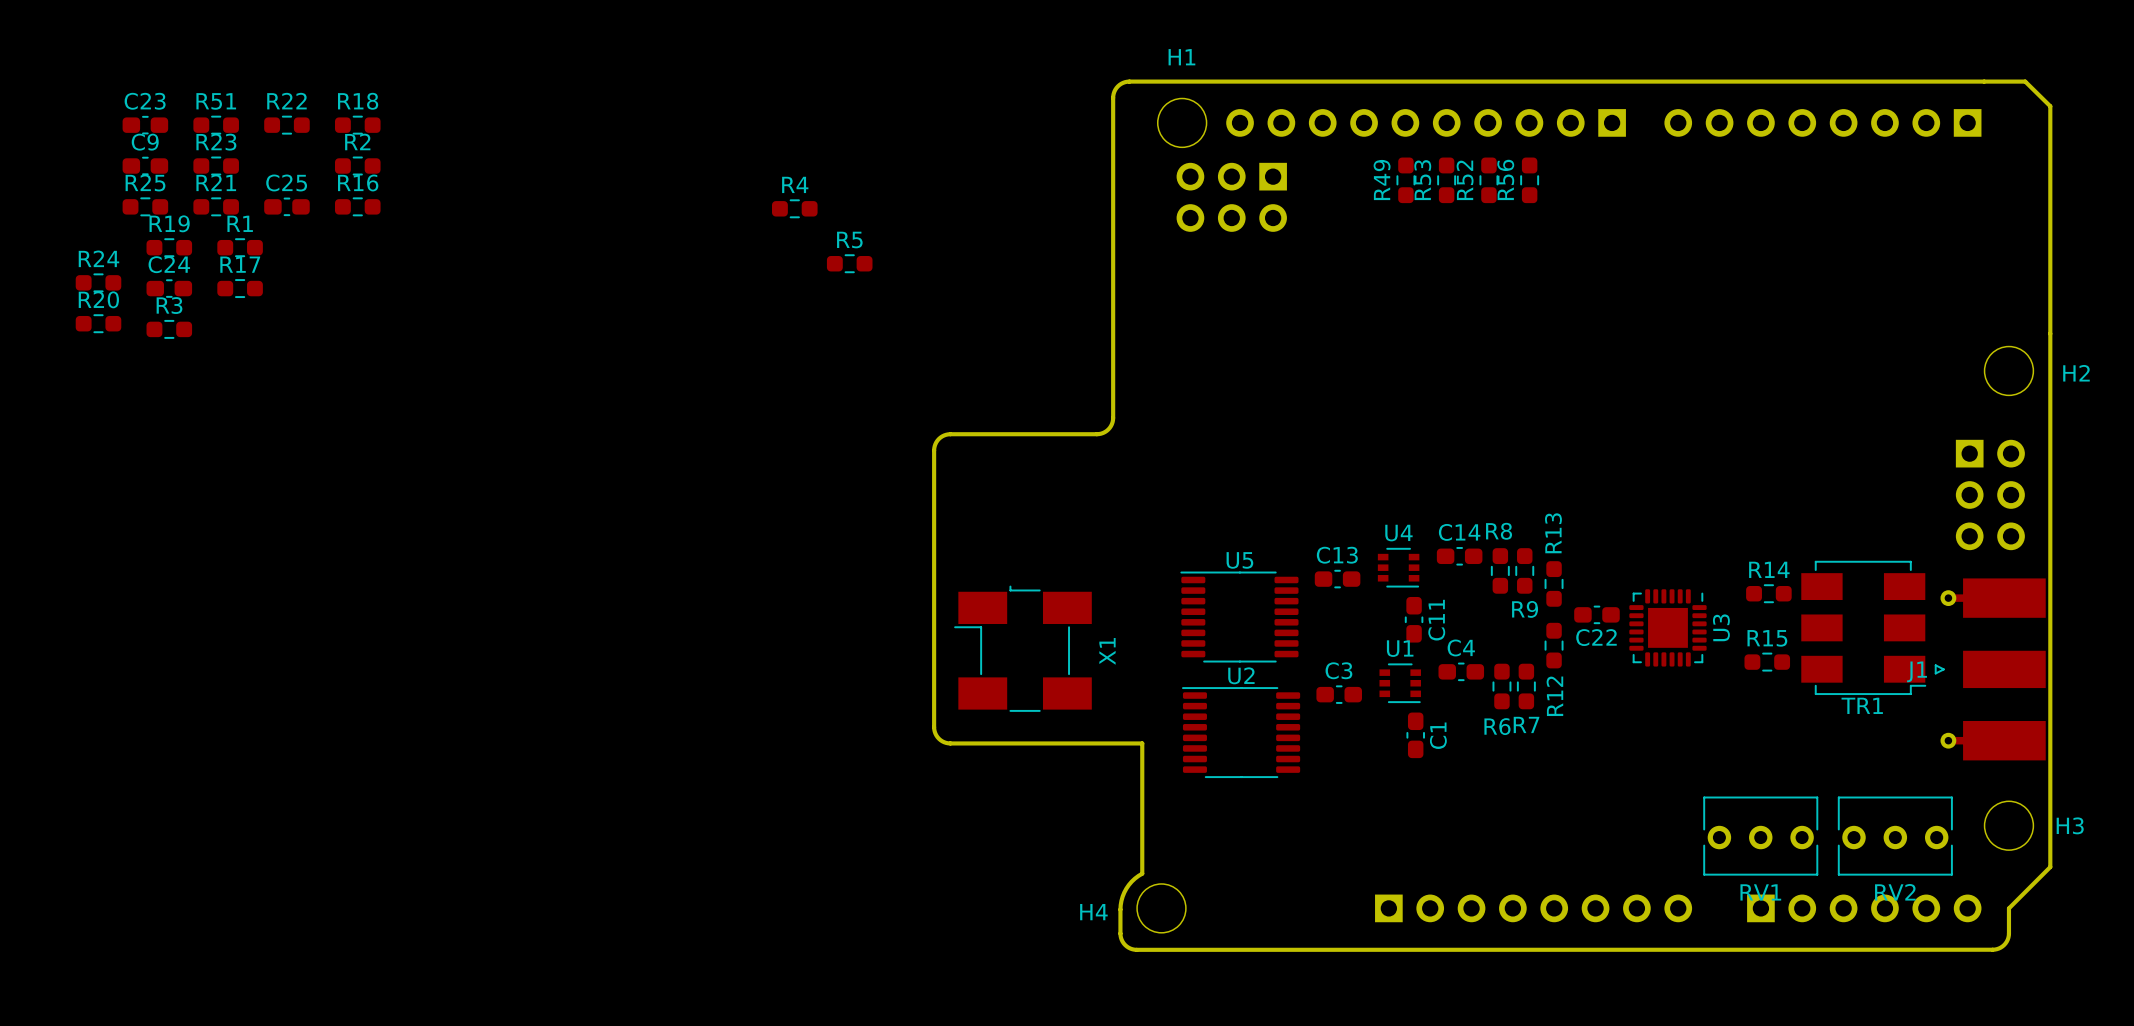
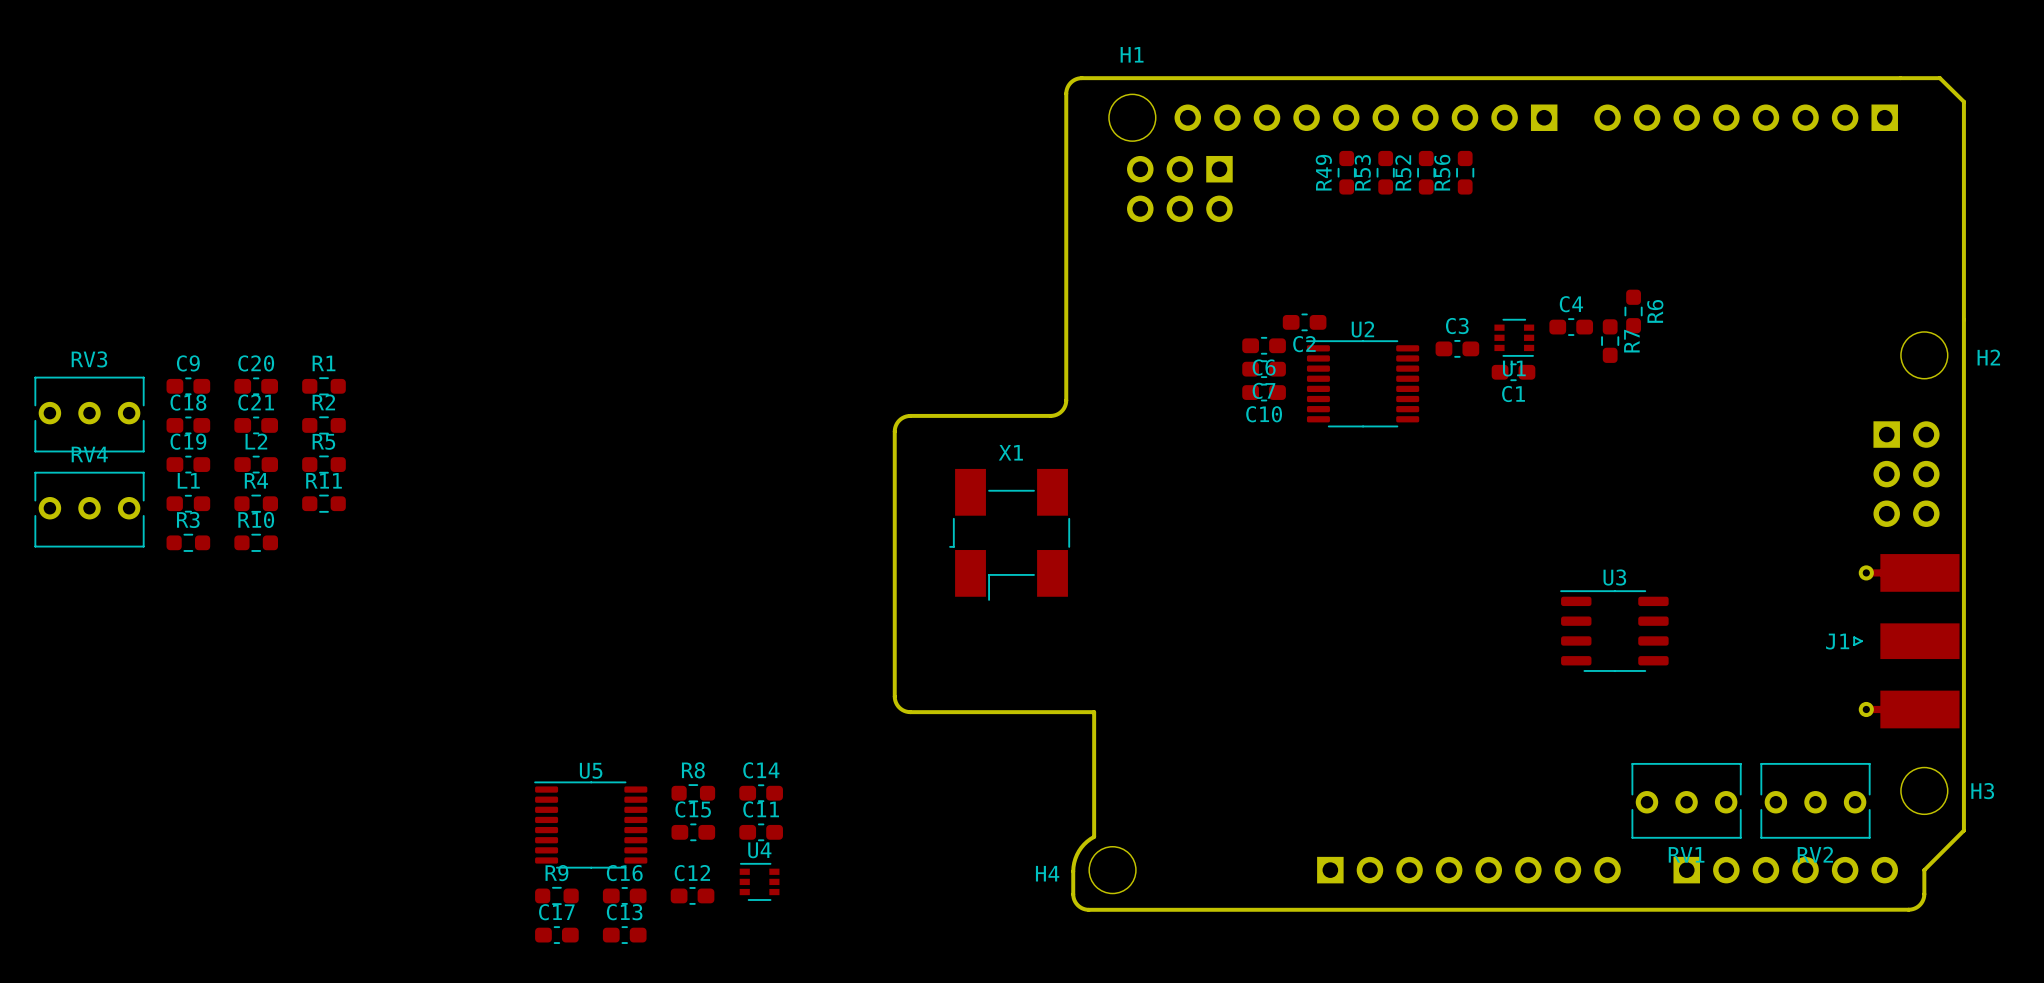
C23: (145, 125) -> none
R51: (216, 125) -> none
R22: (286, 125) -> none
R18: (357, 125) -> none
C9 position: (145, 166) -> (188, 386)
R23: (216, 166) -> none
R2 position: (357, 166) -> (323, 425)
R25: (145, 206) -> none
R21: (216, 206) -> none
C25: (286, 206) -> none
R16: (357, 206) -> none
R4 position: (794, 208) -> (256, 503)
R19: (169, 247) -> none
R1 position: (240, 247) -> (323, 386)
R5 position: (849, 263) -> (323, 464)
R24: (98, 282) -> none
C24: (169, 288) -> none
R17: (240, 288) -> none
R20: (98, 323) -> none
R3 position: (169, 329) -> (188, 542)
C2: none -> (1304, 322)
C6: none -> (1264, 345)
C7: none -> (1264, 369)
C20: none -> (256, 386)
C10: none -> (1264, 392)
RV3: none -> (89, 414)
C18: none -> (188, 425)
C21: none -> (256, 425)
C19: none -> (188, 464)
L2: none -> (256, 464)
L1: none -> (188, 503)
R11: none -> (323, 503)
RV4: none -> (89, 509)
C14 position: (1459, 556) -> (761, 793)
R10: none -> (256, 542)
U4 rotation: 0° (1398, 567) -> 180° (759, 881)
U4 position: (1398, 567) -> (759, 881)
R8 rotation: 0° (1500, 570) -> 90° clockwise (693, 793)
R8 position: (1500, 570) -> (693, 793)
R9 rotation: 0° (1524, 570) -> 90° clockwise (556, 895)
R9 position: (1524, 570) -> (556, 895)
C13 position: (1337, 579) -> (624, 935)
R13: (1554, 583) -> none
U3 footprint: [1629, 589, 1707, 667] -> [1560, 590, 1669, 672]
R14: (1768, 593) -> none
R9 name position: R9 (1525, 609) -> R9 (556, 873)
C22: (1596, 614) -> none
U5 position: (1239, 617) -> (590, 825)
C11 rotation: 0° (1414, 619) -> 90° clockwise (761, 832)
C11 position: (1414, 619) -> (761, 832)
C11 name position: C11 (1436, 620) -> C11 (761, 809)
U3 name position: U3 (1721, 627) -> U3 (1614, 577)
TR1: (1863, 627) -> none
R12: (1554, 645) -> none
X1 rotation: 0° (1022, 648) -> 90° counterclockwise (1009, 534)
X1 position: (1022, 648) -> (1009, 534)
U1 name position: U1 (1400, 648) -> U1 (1514, 368)
R15: (1767, 662) -> none
C4 position: (1461, 671) -> (1571, 327)
U1 position: (1400, 683) -> (1514, 337)
R6 position: (1501, 686) -> (1633, 311)
R7 position: (1526, 686) -> (1610, 341)
C3 position: (1339, 694) -> (1457, 348)
R7 name rotation: 0° (1526, 724) -> 90° counterclockwise (1631, 341)
R7 name position: R7 (1526, 724) -> R7 (1631, 341)
R6 name rotation: 0° (1497, 726) -> 90° counterclockwise (1655, 311)
R6 name position: R6 (1497, 726) -> R6 (1655, 311)
U2 position: (1241, 732) -> (1362, 383)
C1 rotation: 0° (1415, 735) -> 90° clockwise (1513, 372)
C1 position: (1415, 735) -> (1513, 372)
C15: none -> (693, 832)
C16: none -> (624, 895)
C12: none -> (692, 895)
C17: none -> (556, 935)

